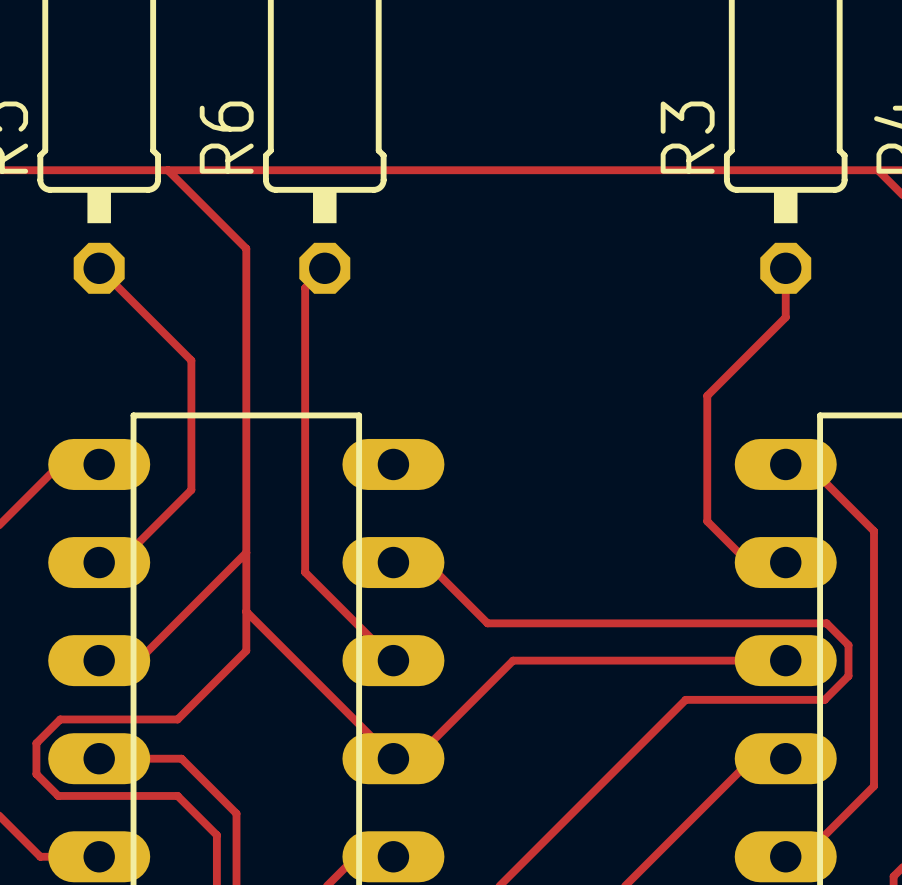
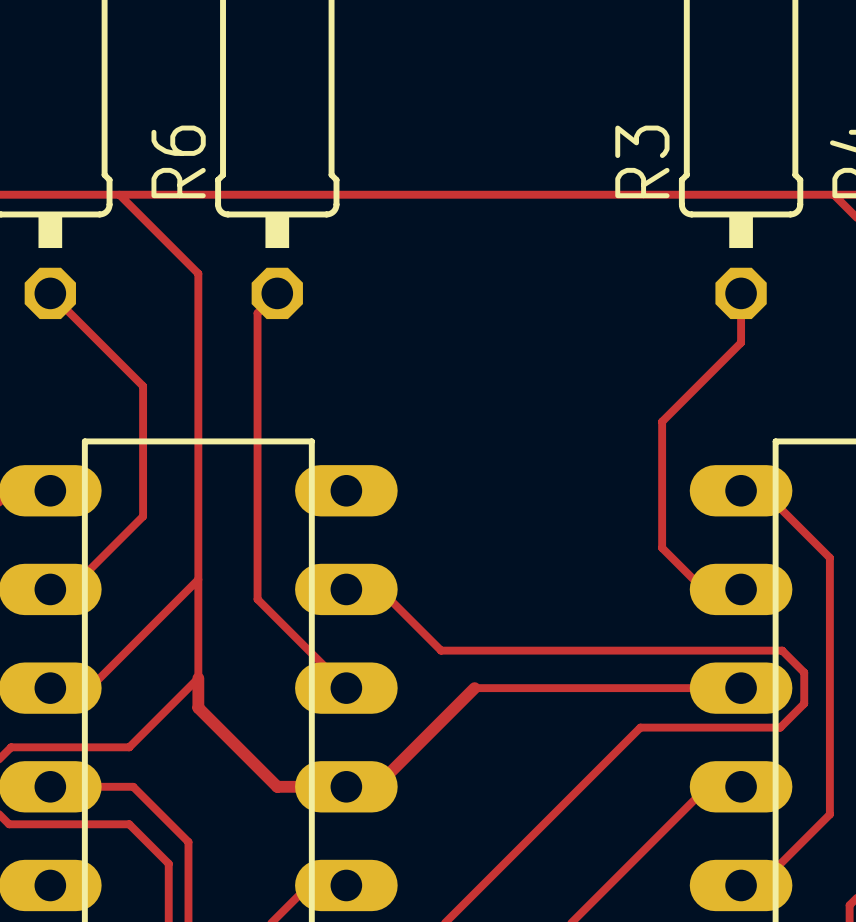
top track: (246, 611) (393, 758) (393, 756) (416, 756) (513, 660) (520, 660) -> (198, 678) (198, 707) (277, 786) (375, 786) (474, 688)

